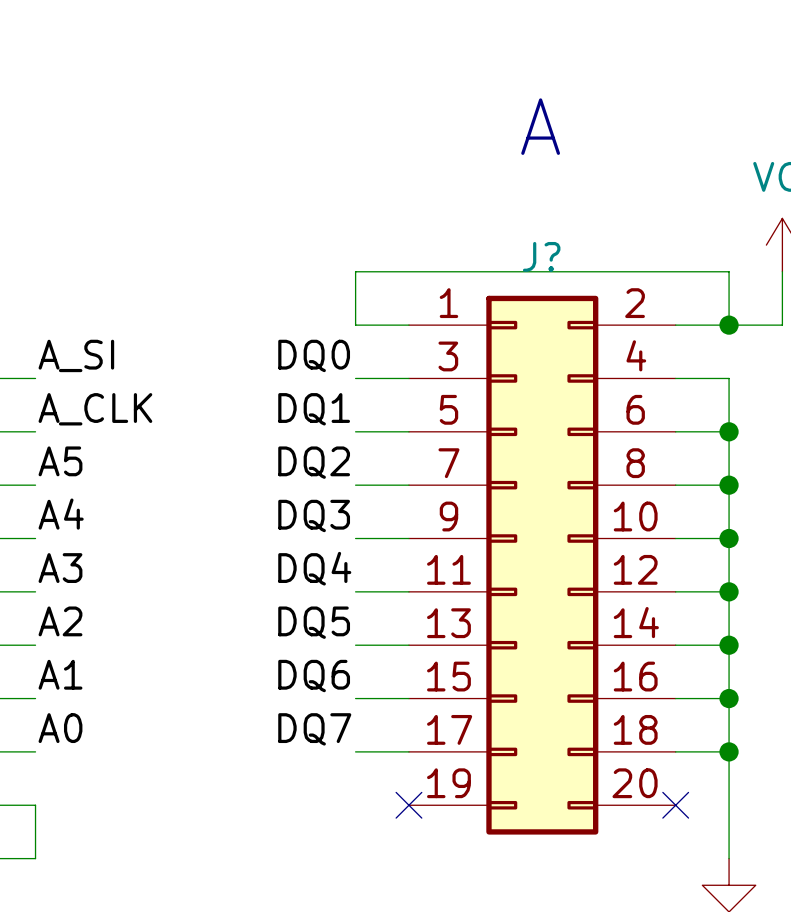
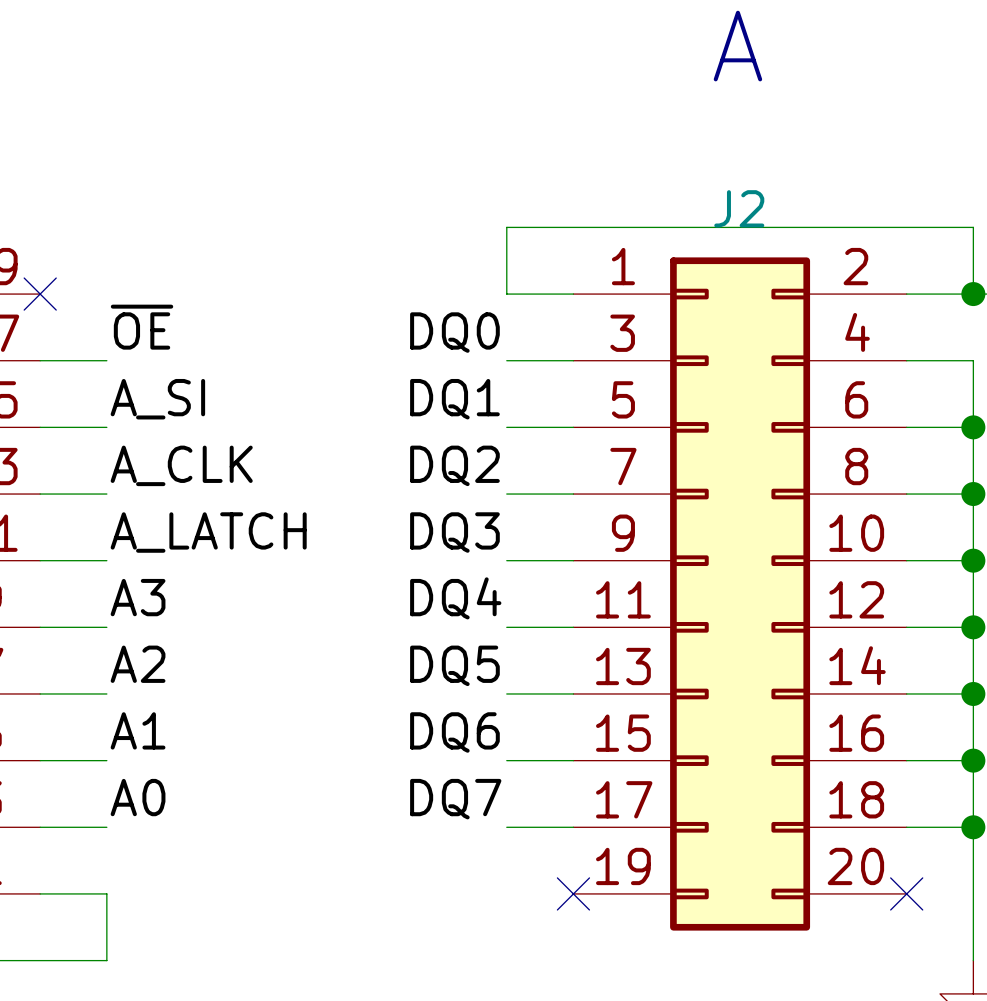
J? name: J? (541, 256) -> J2 (739, 208)
label: A_SI (76, 355) -> ~{OE} (142, 327)
label: A_CLK (95, 409) -> A_SI (157, 399)
label: A5 (60, 461) -> A_CLK (181, 465)
label: A4 (61, 514) -> A_LATCH (208, 532)

